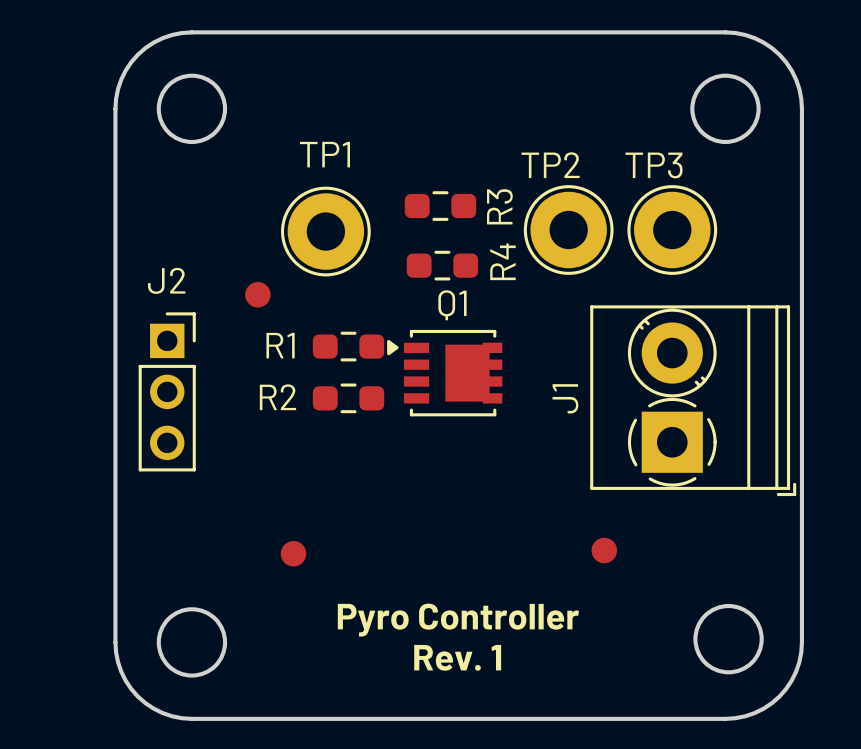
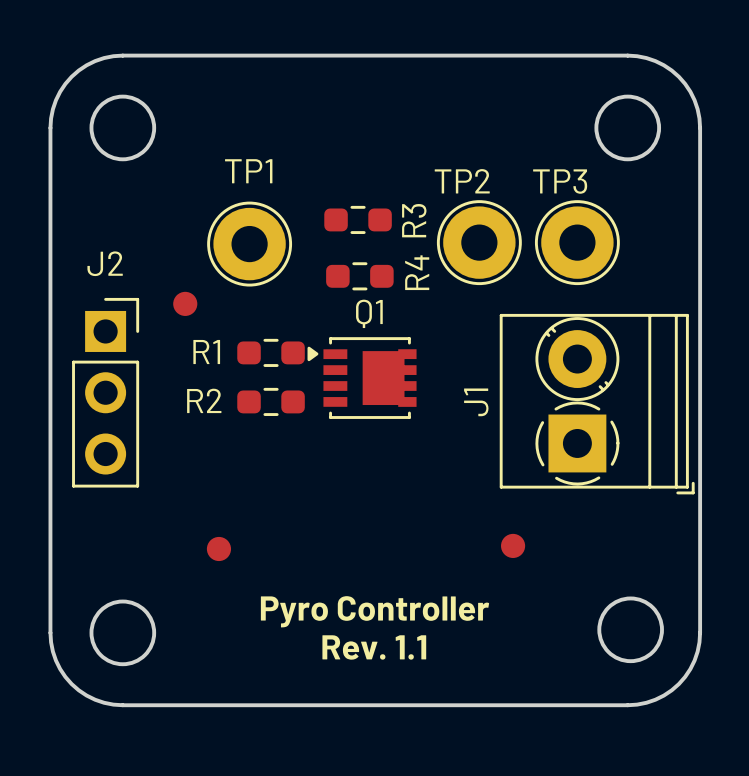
J2 footprint: [138, 312, 196, 472] -> [72, 297, 140, 488]
text: Rev. 1 (457, 657) -> Rev. 1.1 (374, 647)

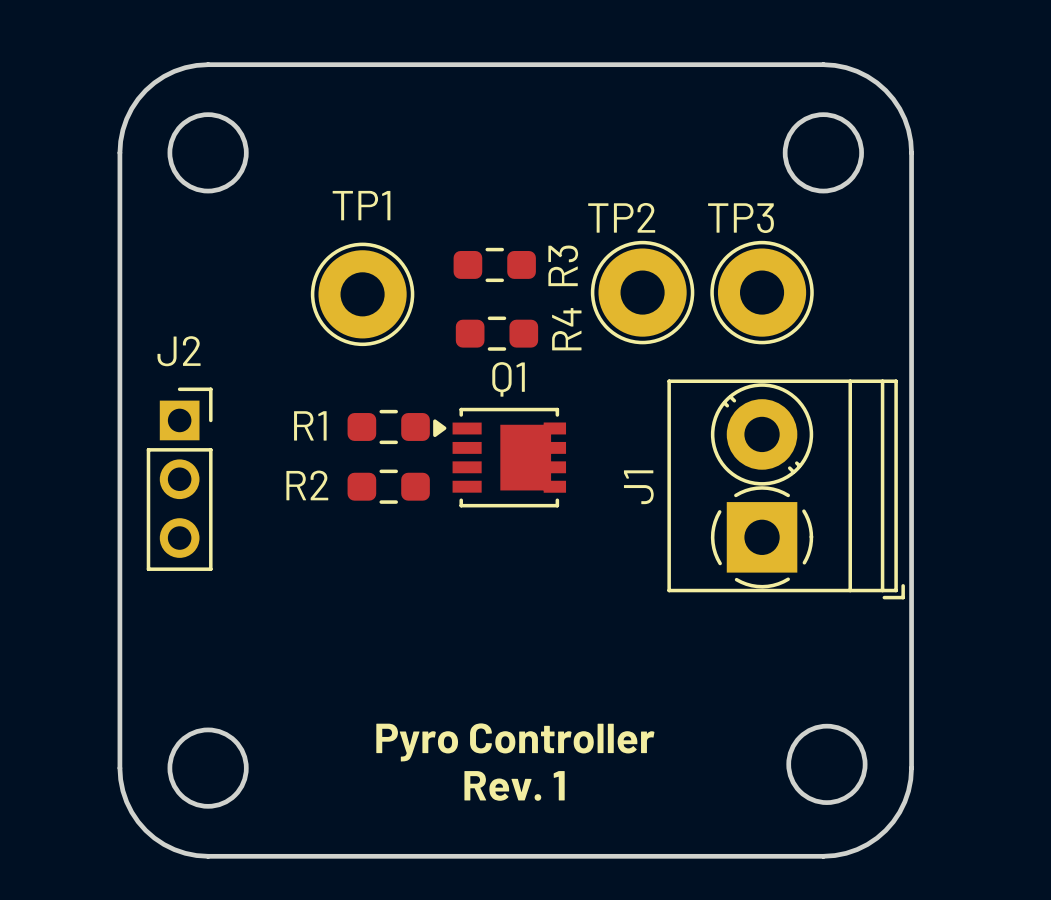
J2 footprint: [72, 297, 140, 488] -> [146, 387, 213, 571]
part: (185, 303) -> none
part: (513, 545) -> none
part: (218, 548) -> none
text: Rev. 1.1 (374, 647) -> Rev. 1 (514, 785)

